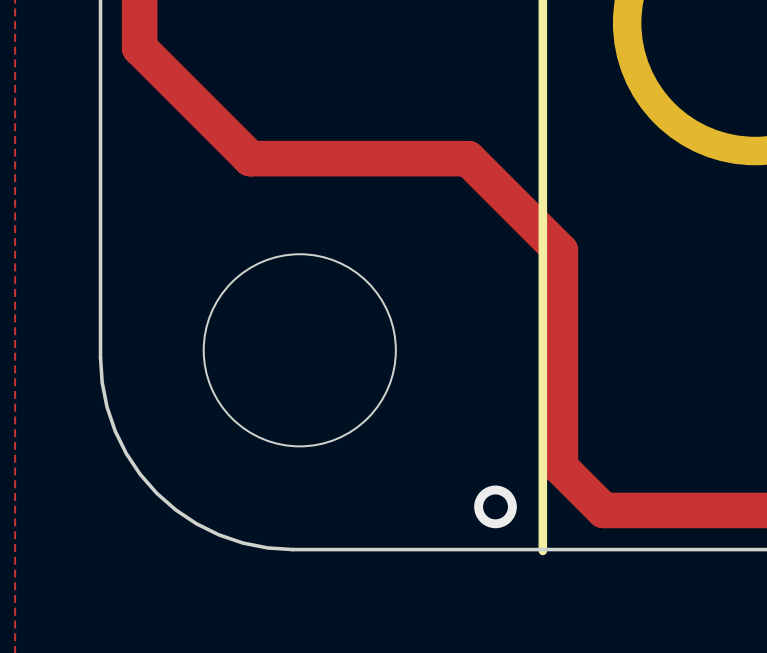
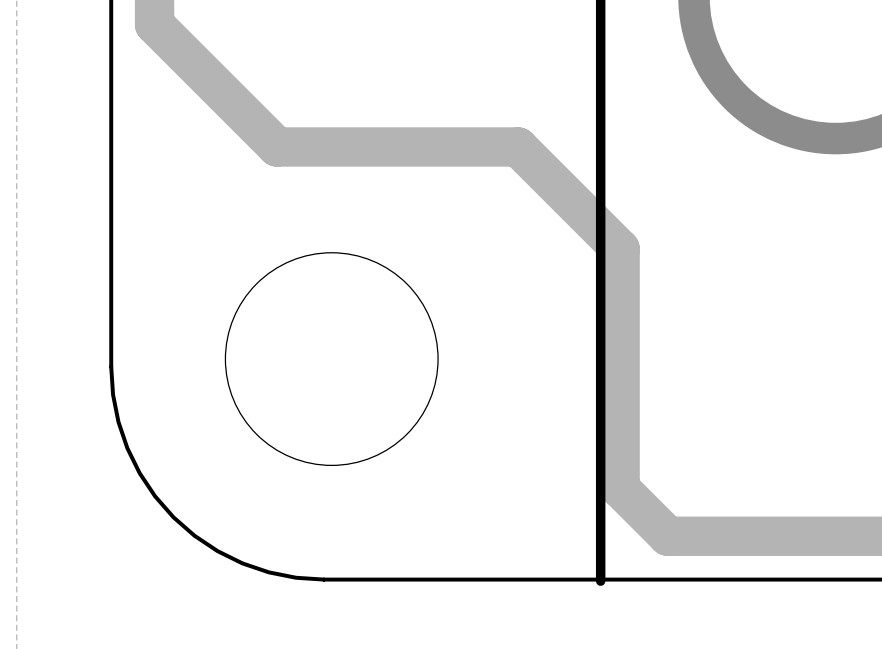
via: (495, 506) -> none

